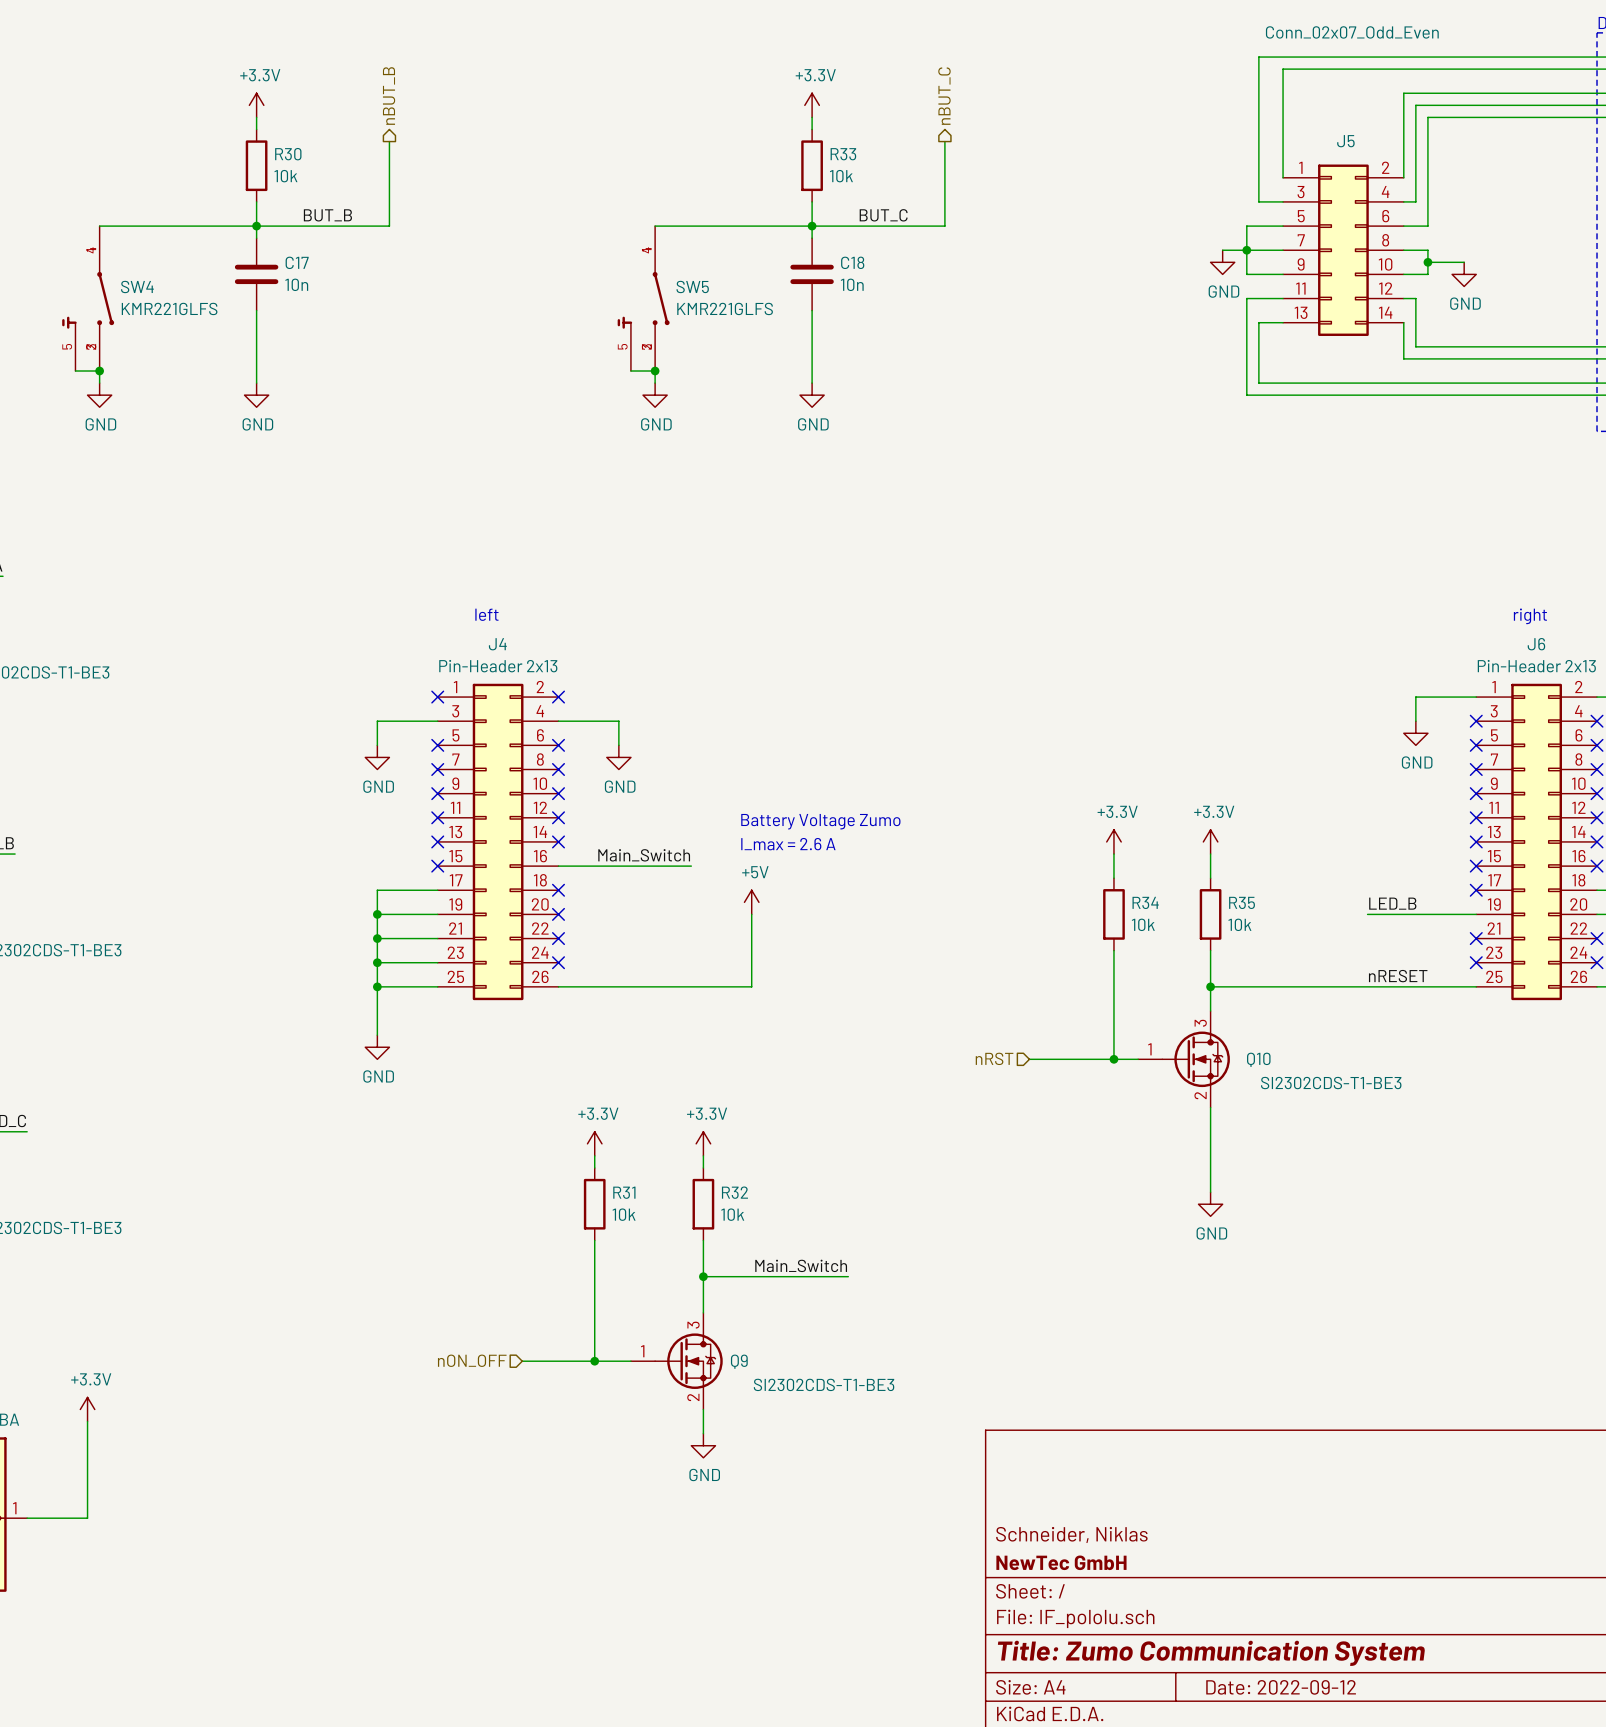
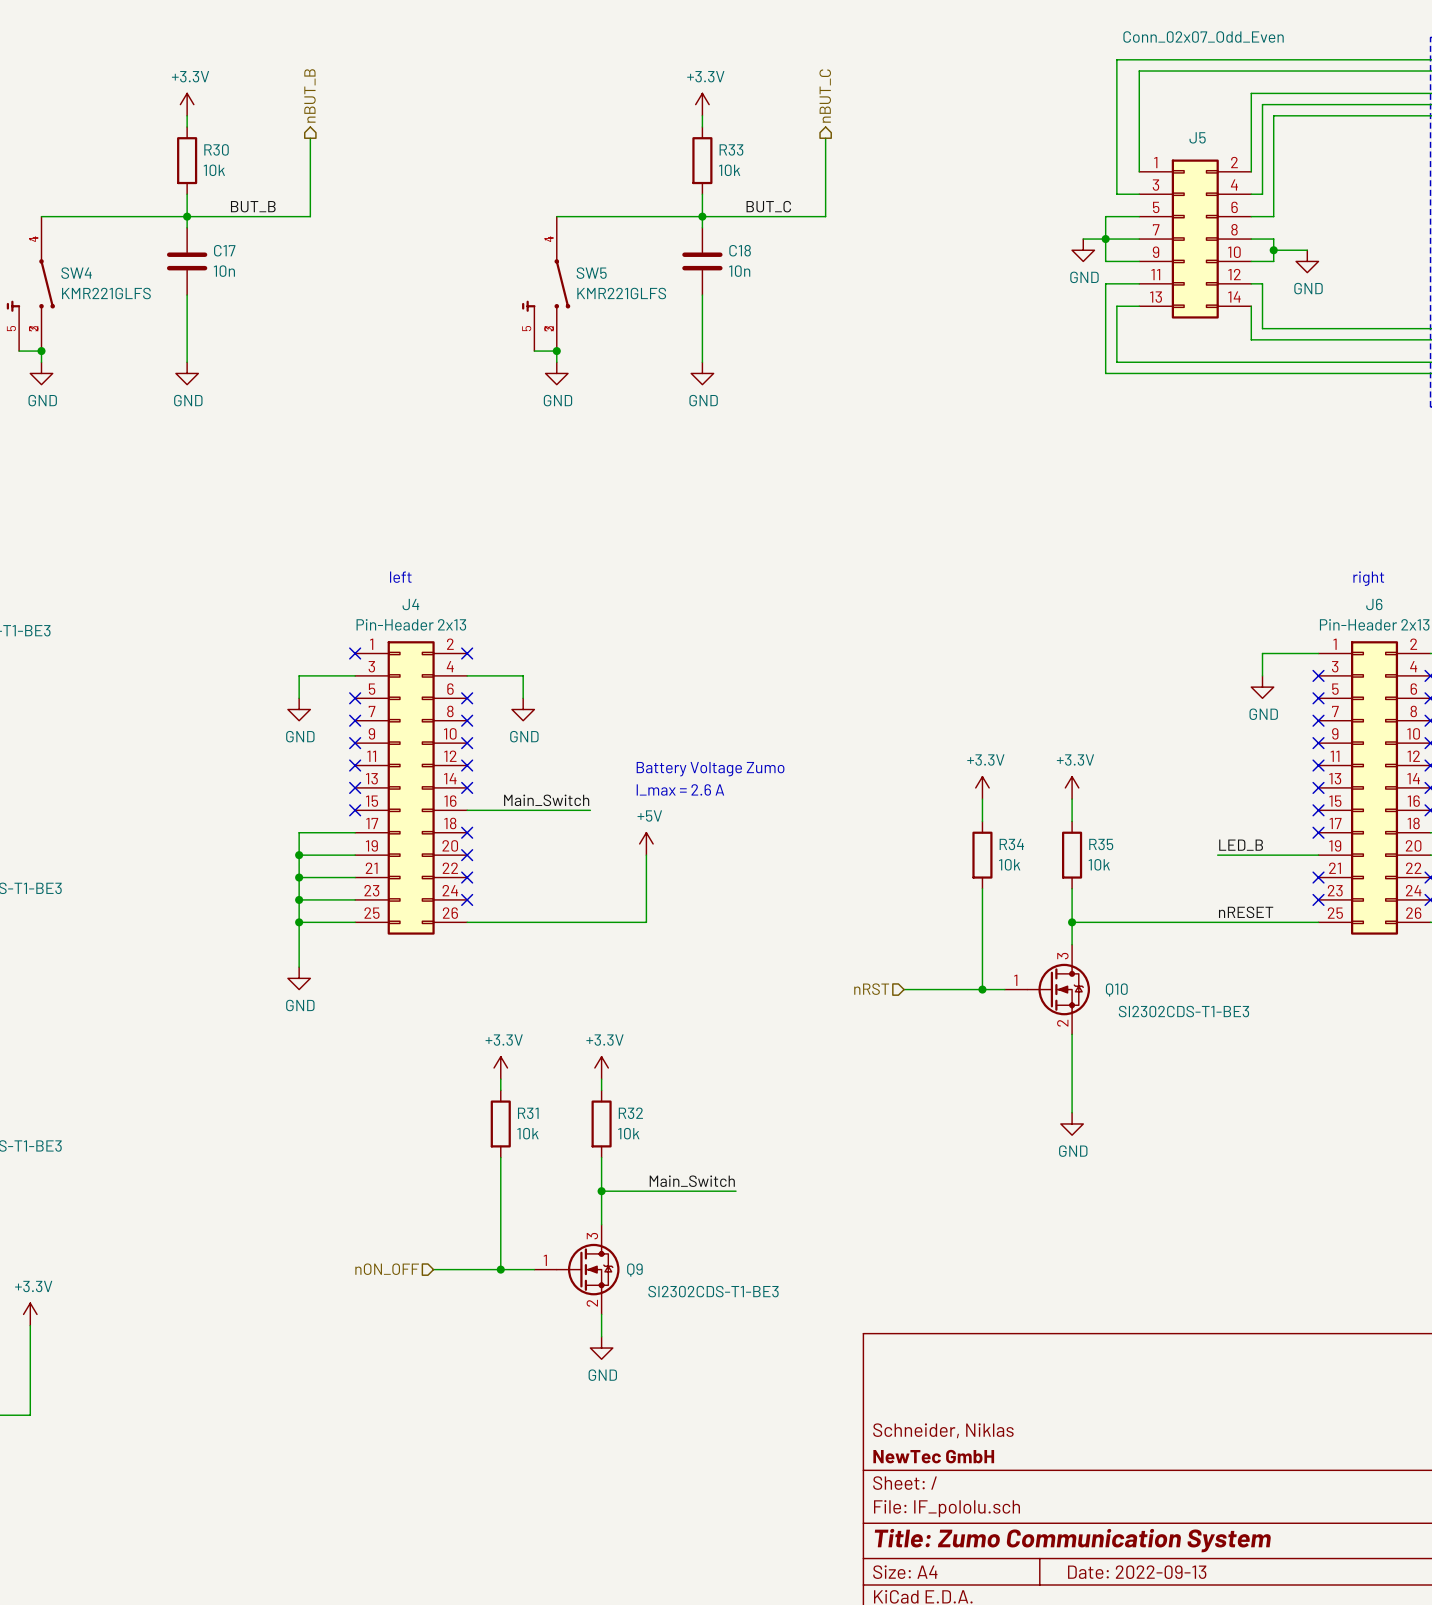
title block: Date: 2022-09-12 (1281, 1687) -> Date: 2022-09-13 (1137, 1572)

